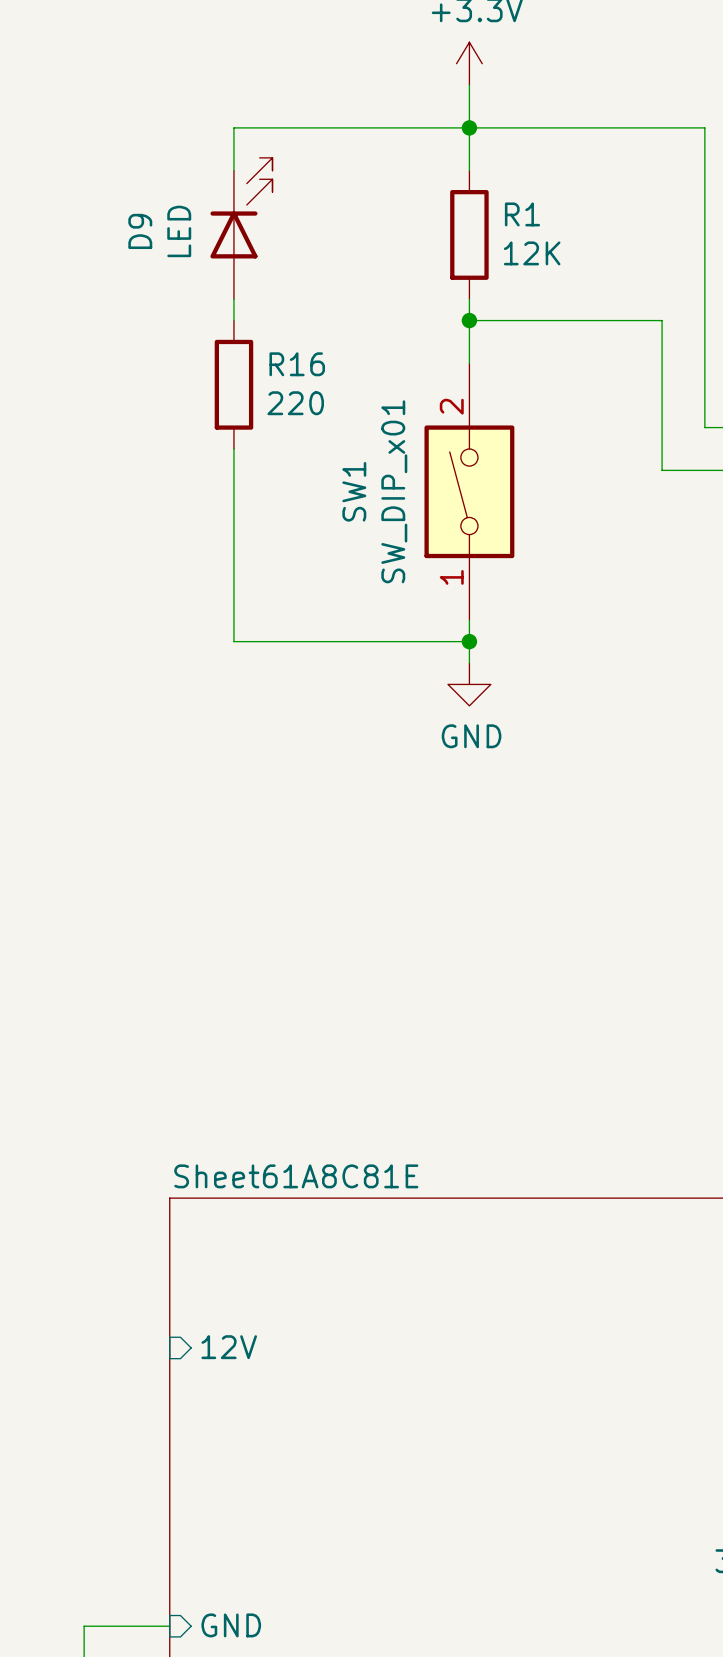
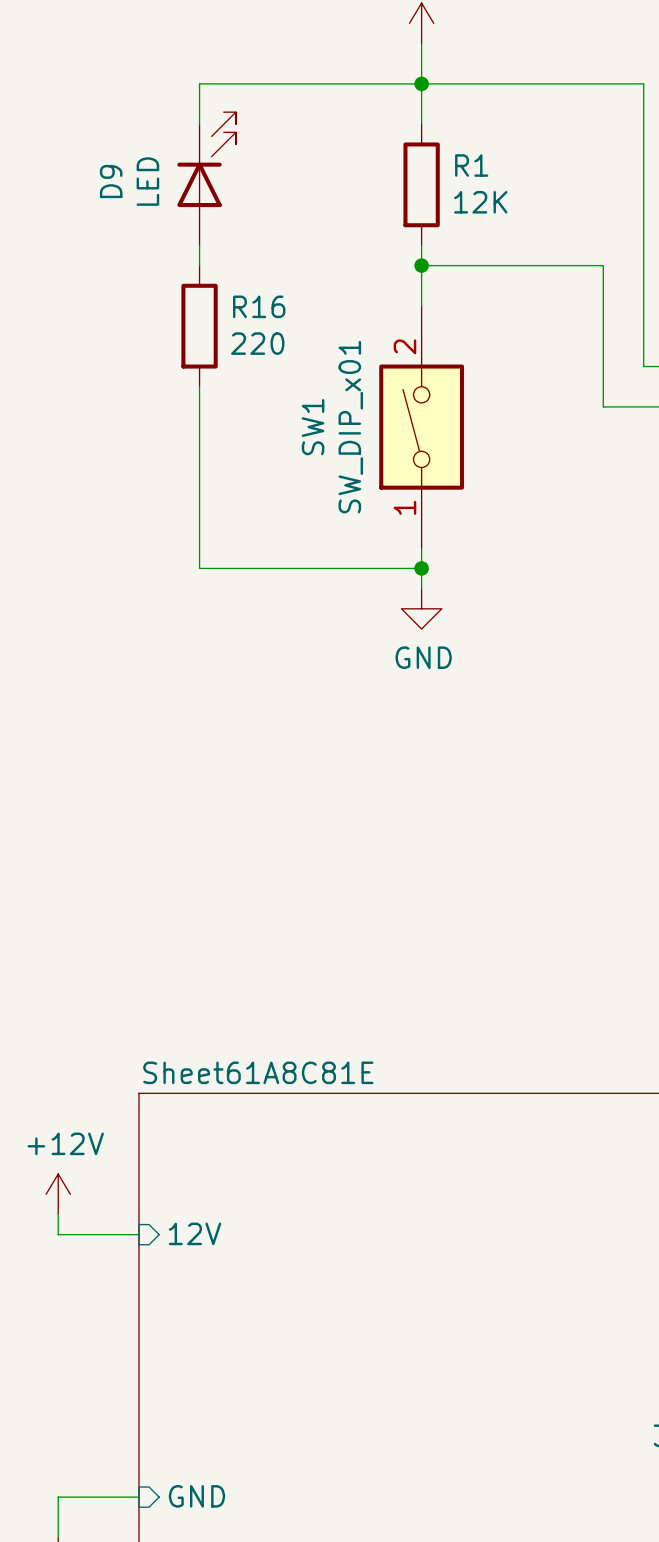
power symbol: none -> +12V (58, 1194)
wire: none -> (58, 1214) (58, 1234) (138, 1234)

